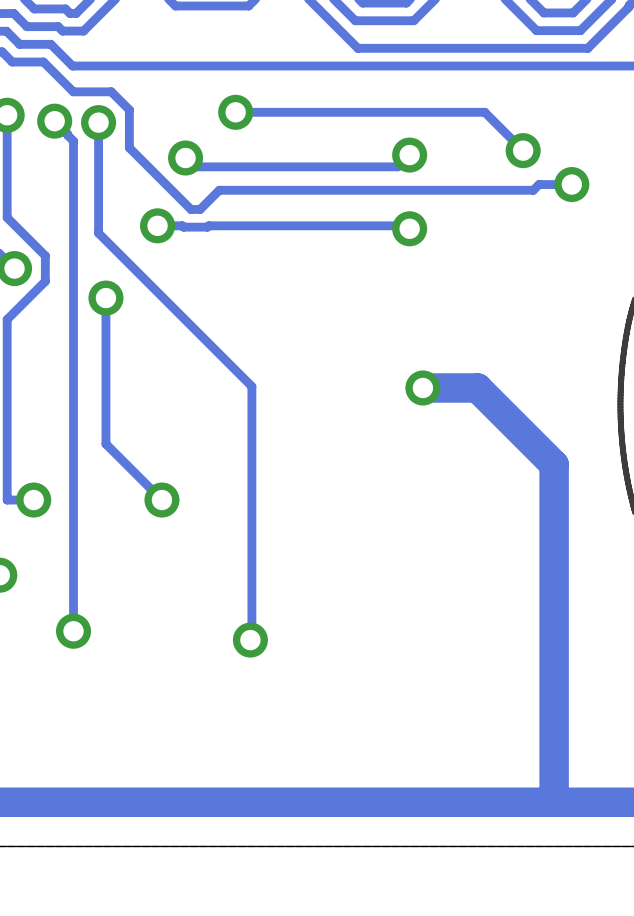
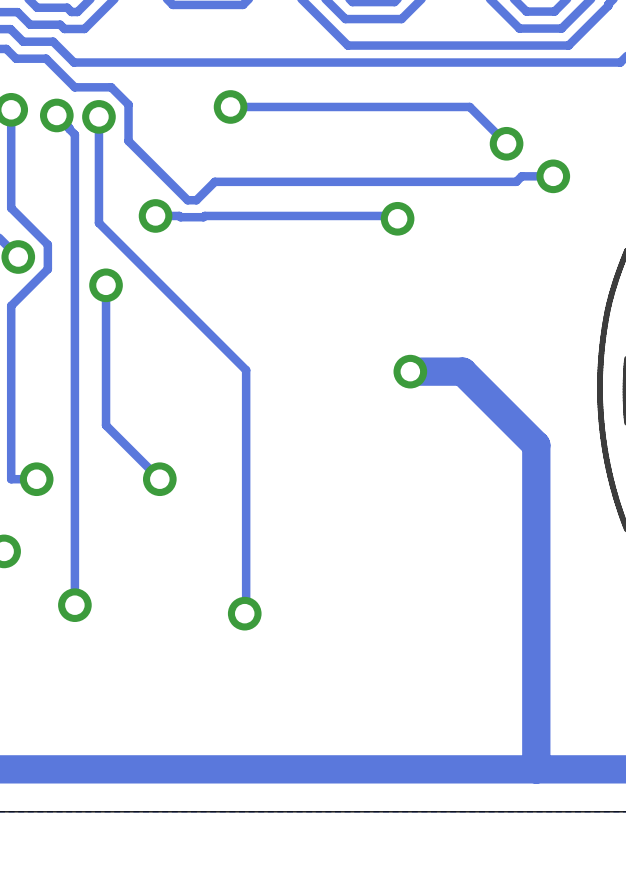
track: (409, 155) (397, 166) (194, 166) (185, 158) -> none
via: (409, 155) -> none
via: (185, 158) -> none

